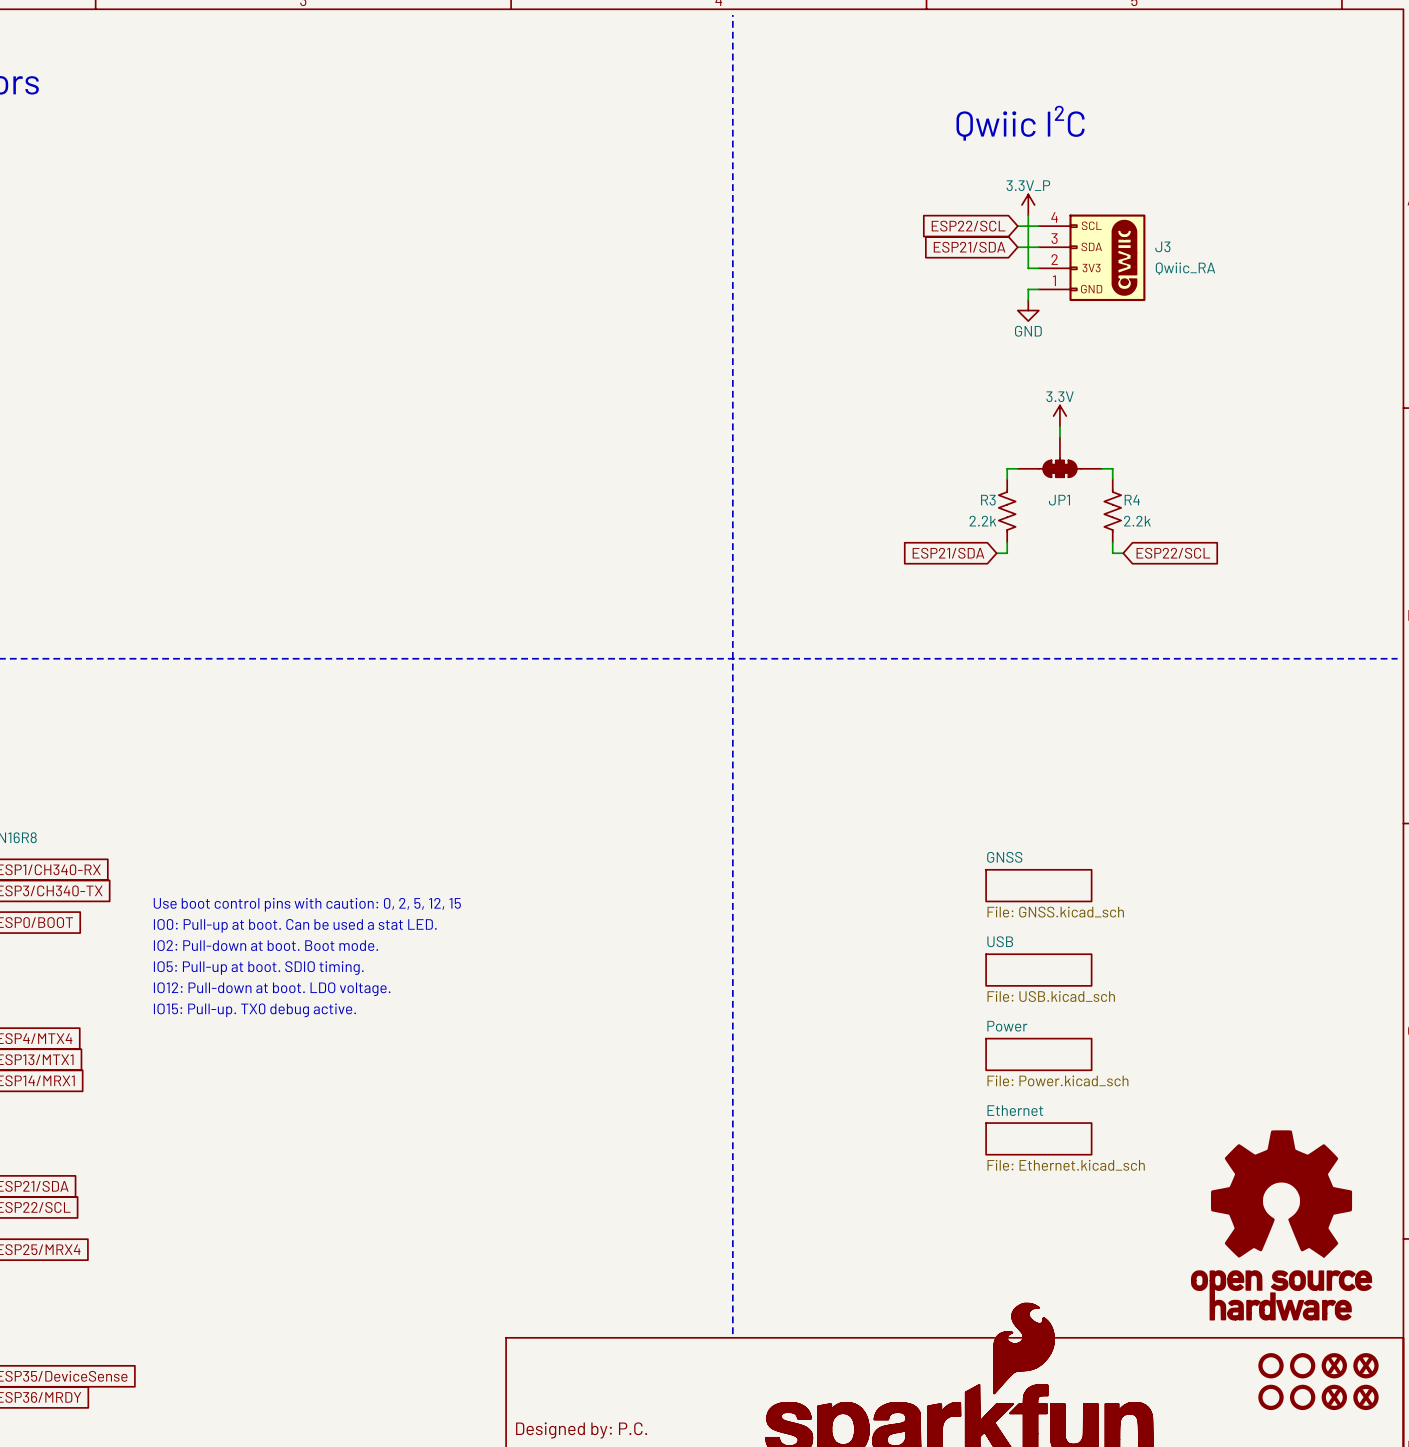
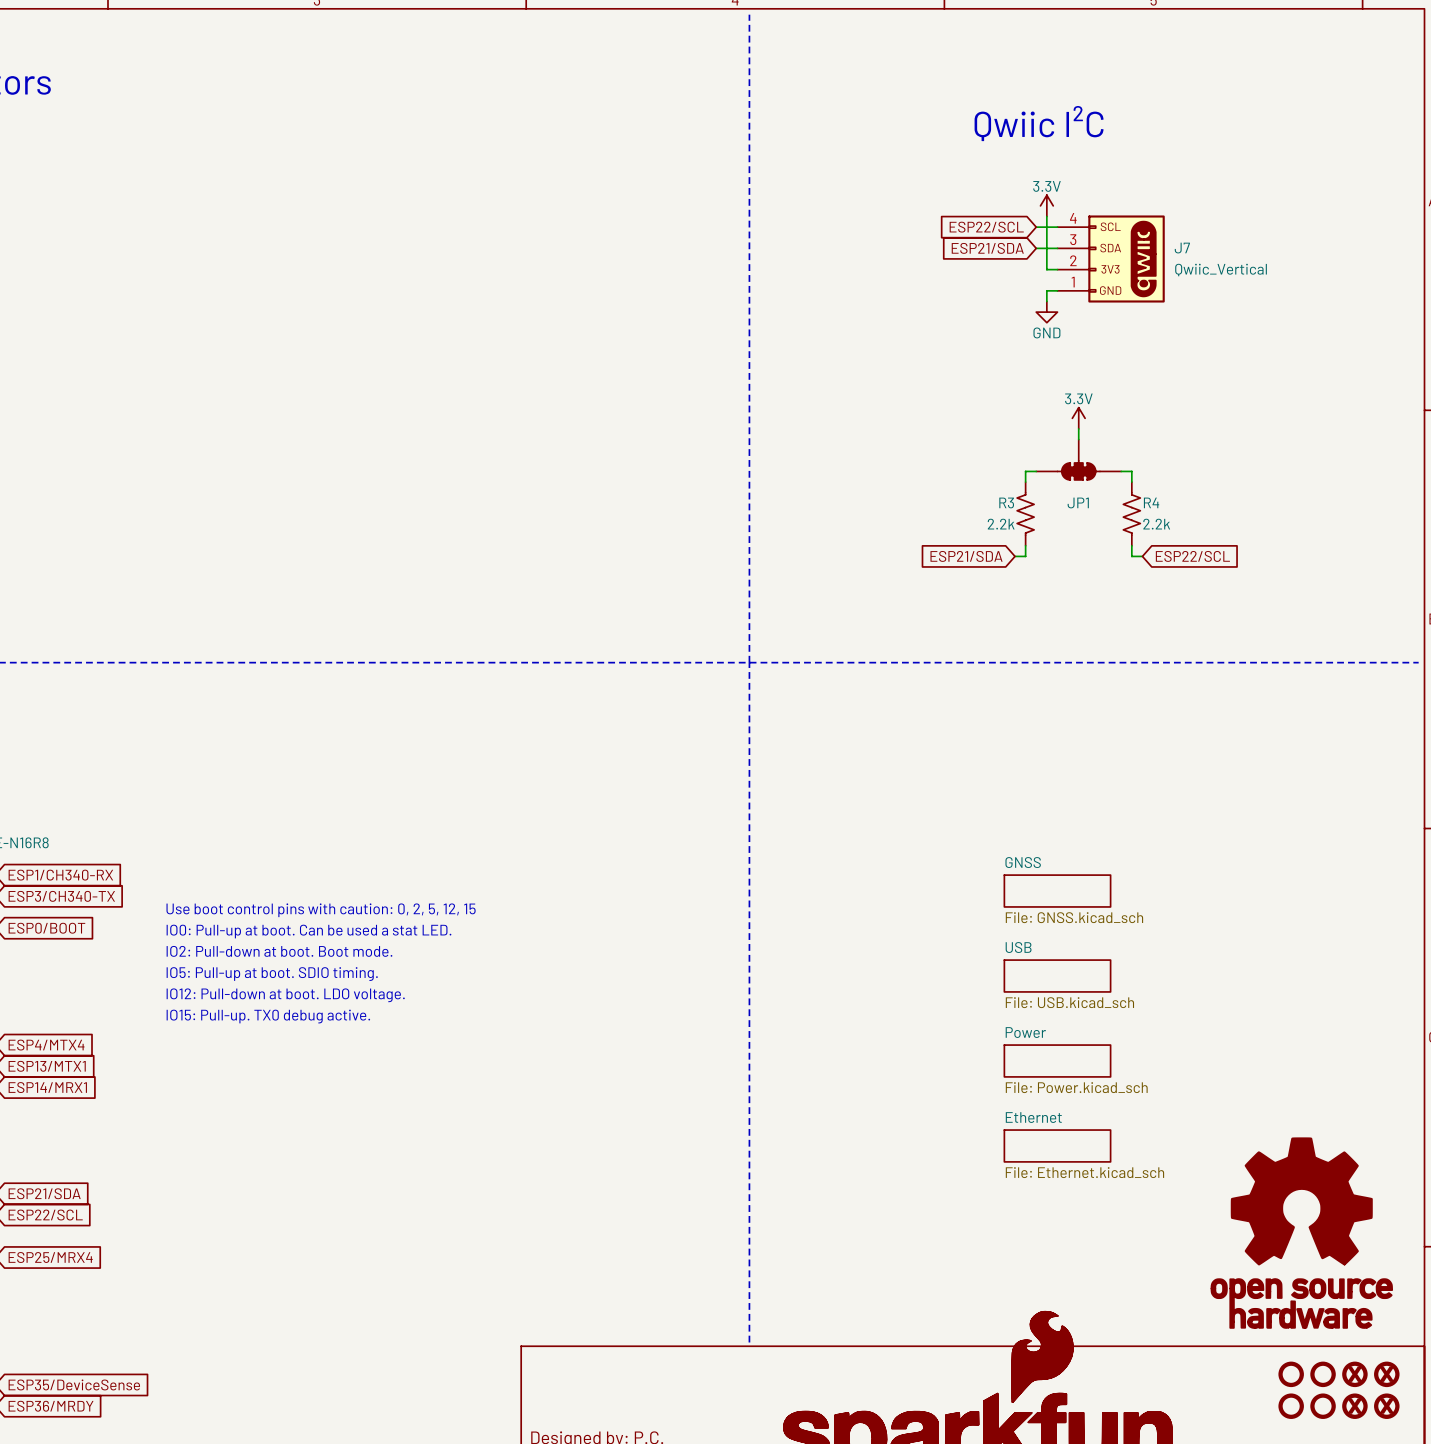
power symbol: 3.3V_P (1028, 205) -> 3.3V (1046, 205)
J3 name: J3 (1162, 246) -> J7 (1182, 248)
J3 value: Qwiic_RA (1185, 268) -> Qwiic_Vertical (1221, 270)

